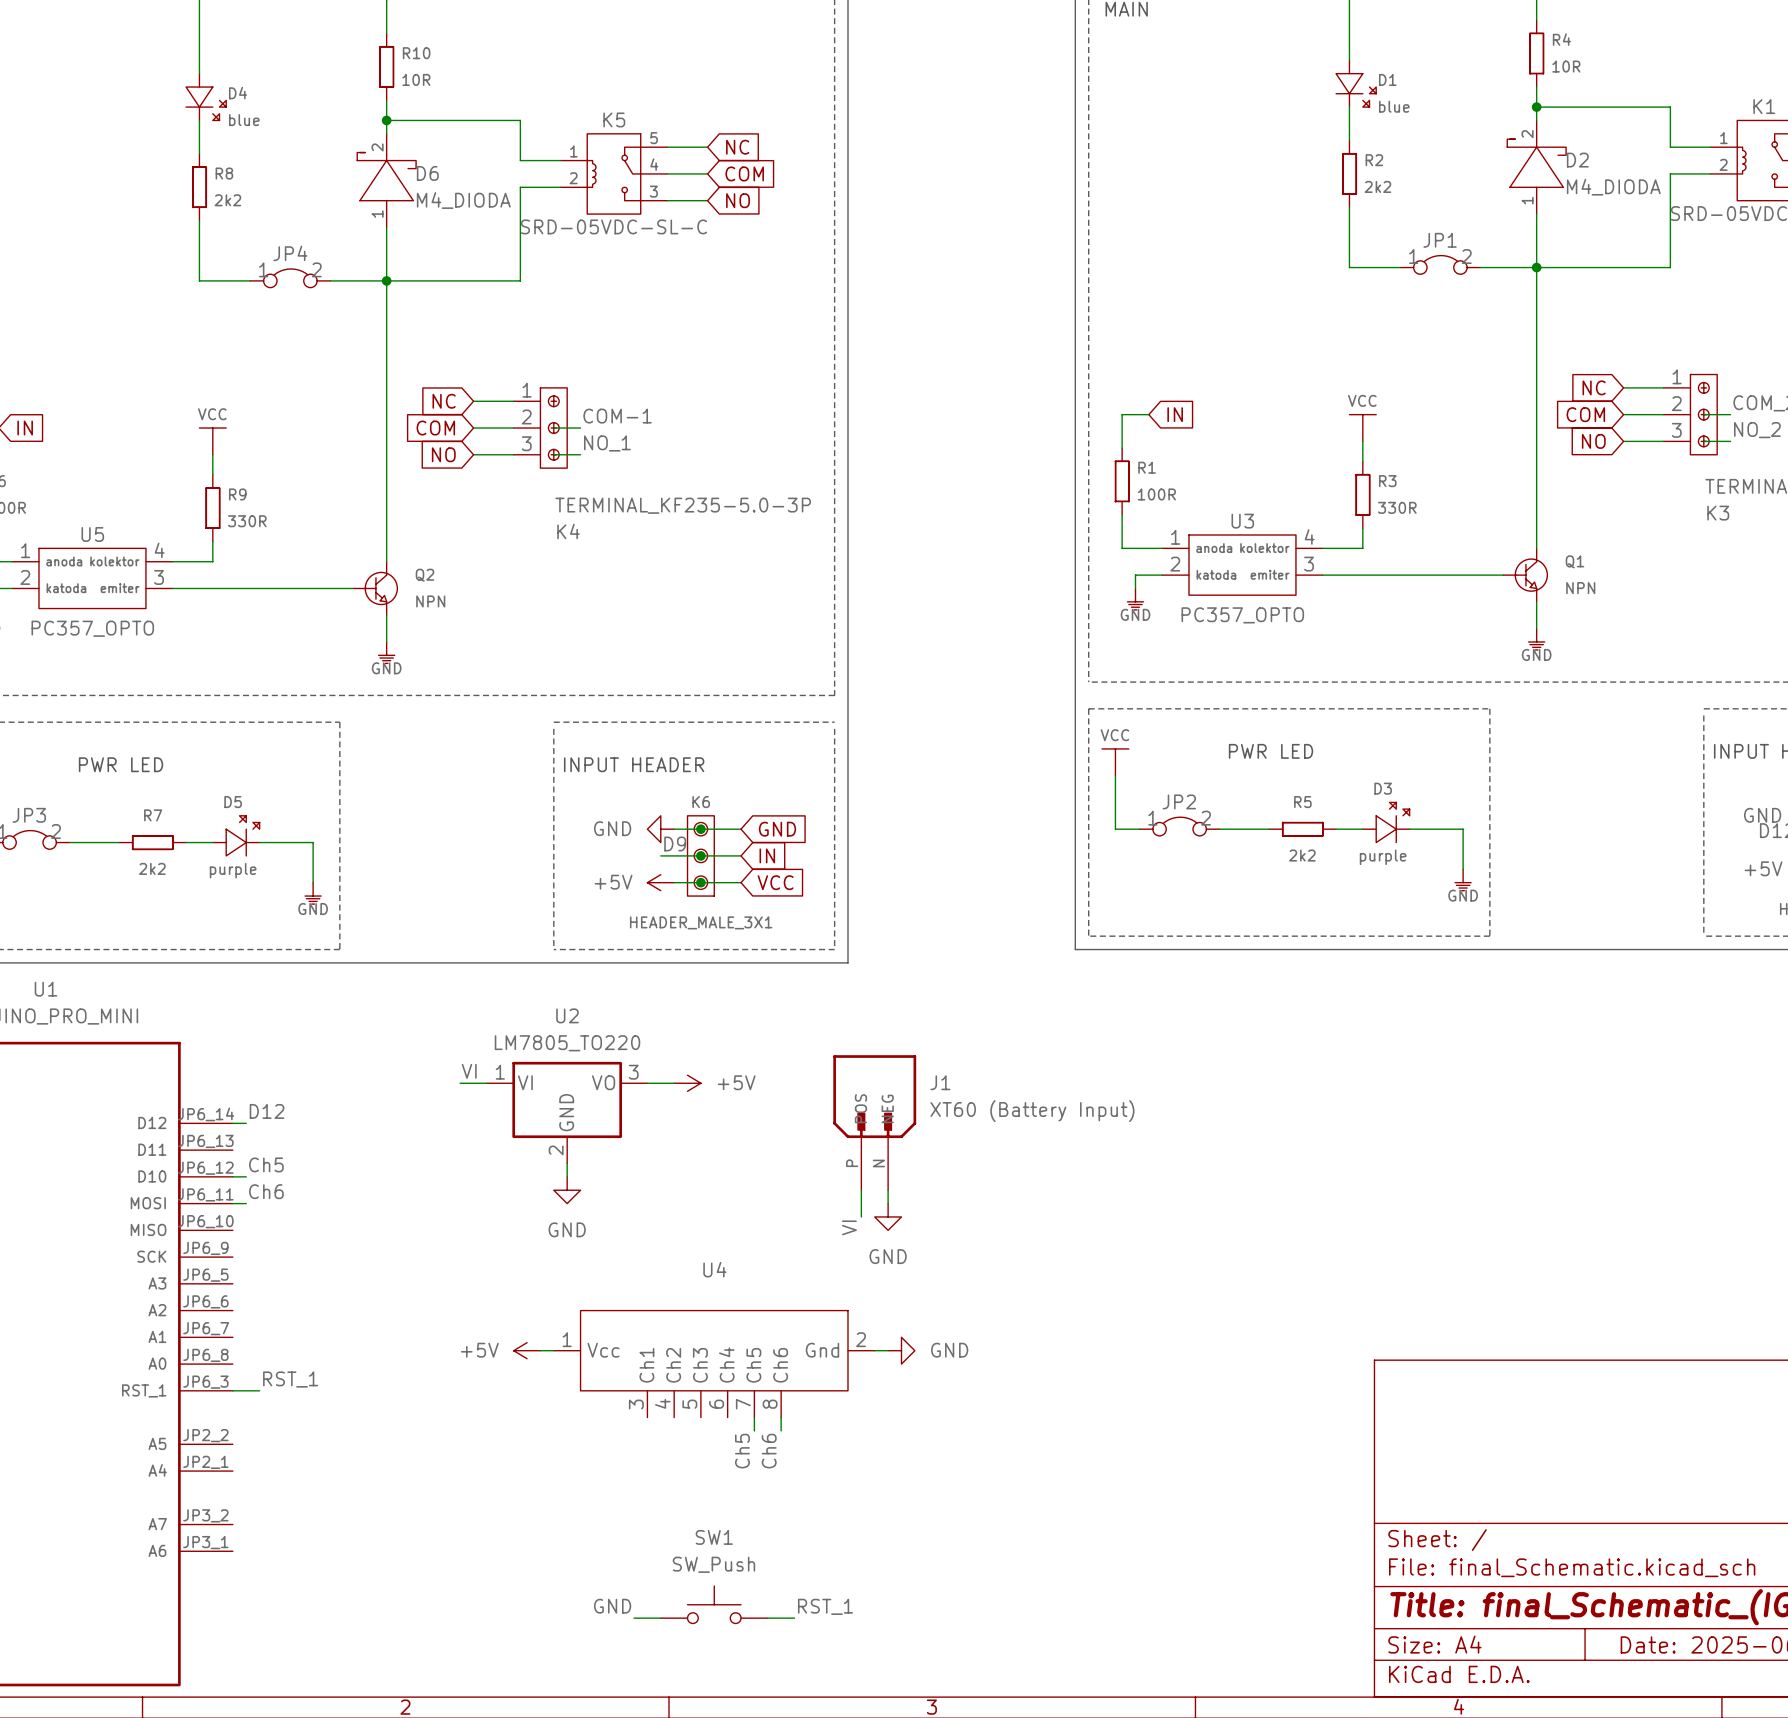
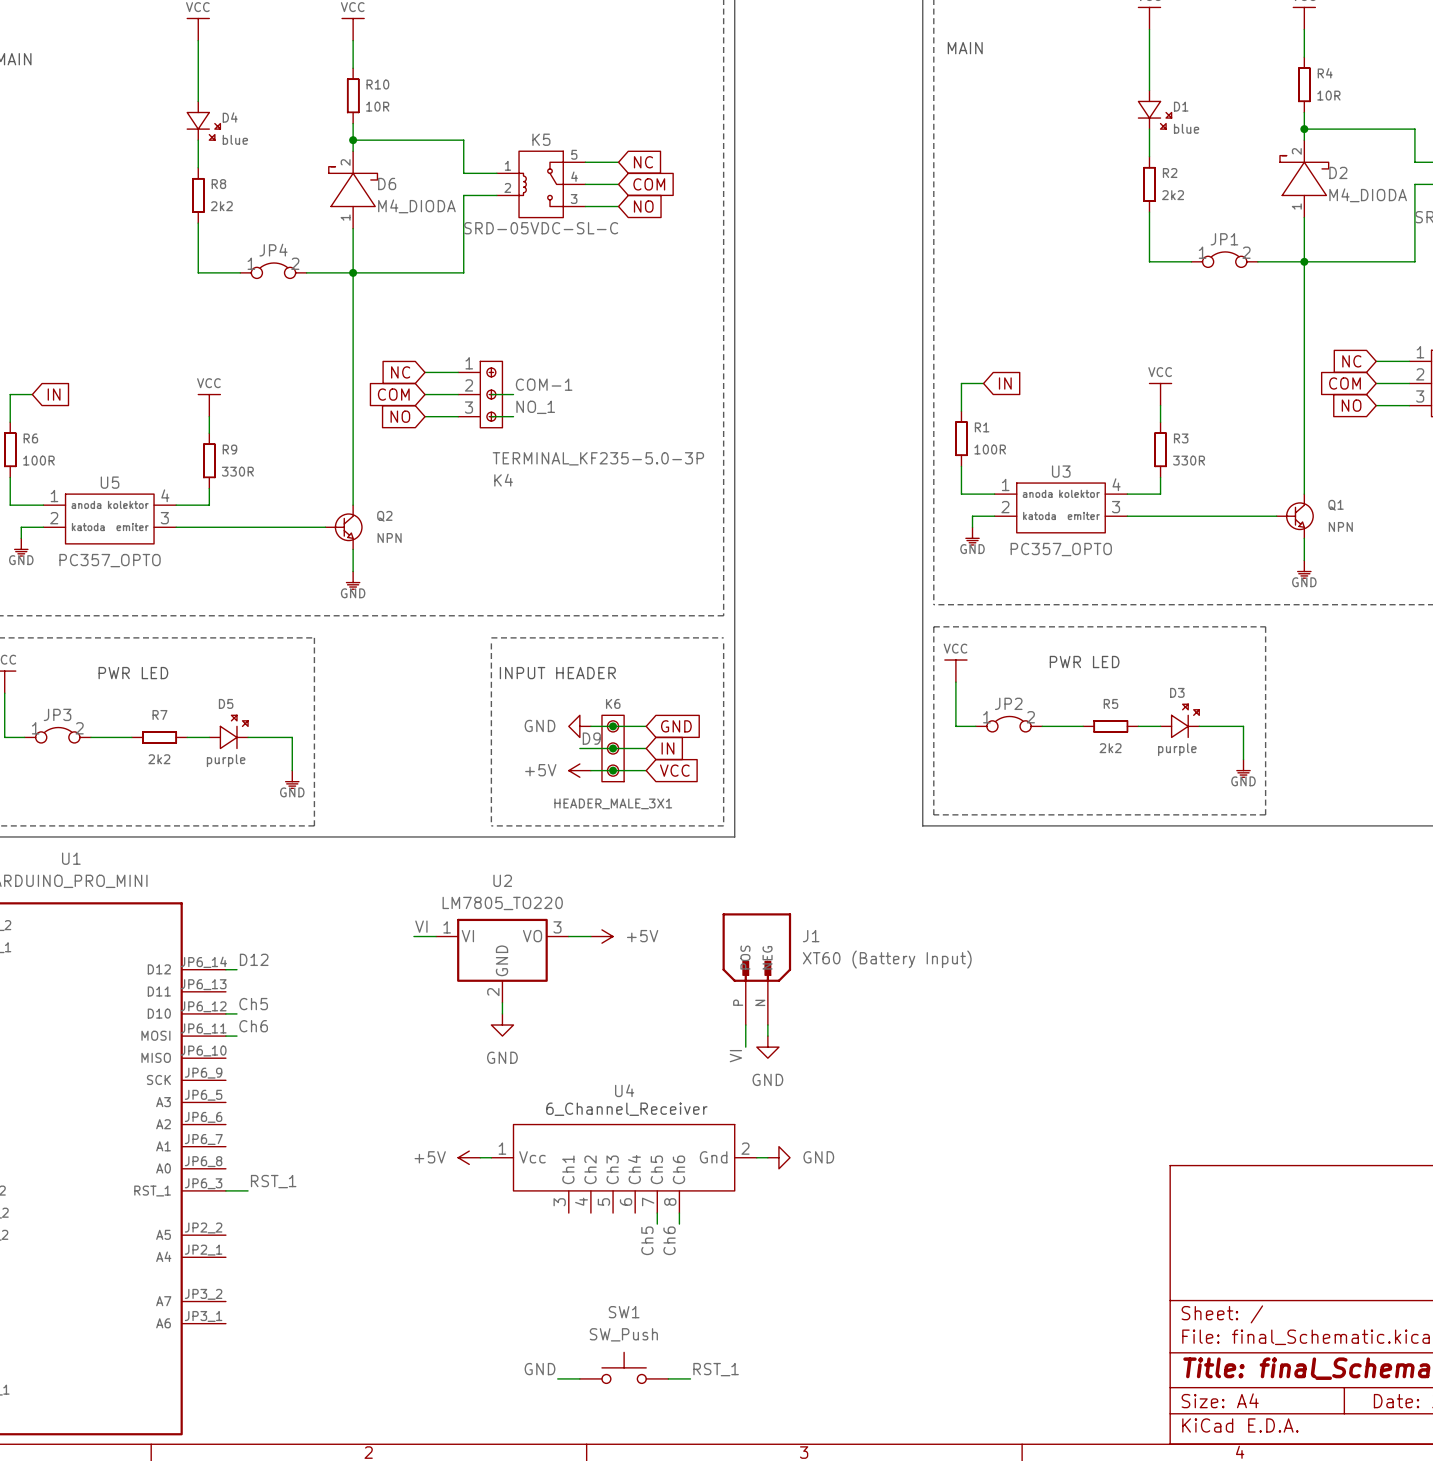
text: none -> 6_Channel_Receiver (626, 1109)

